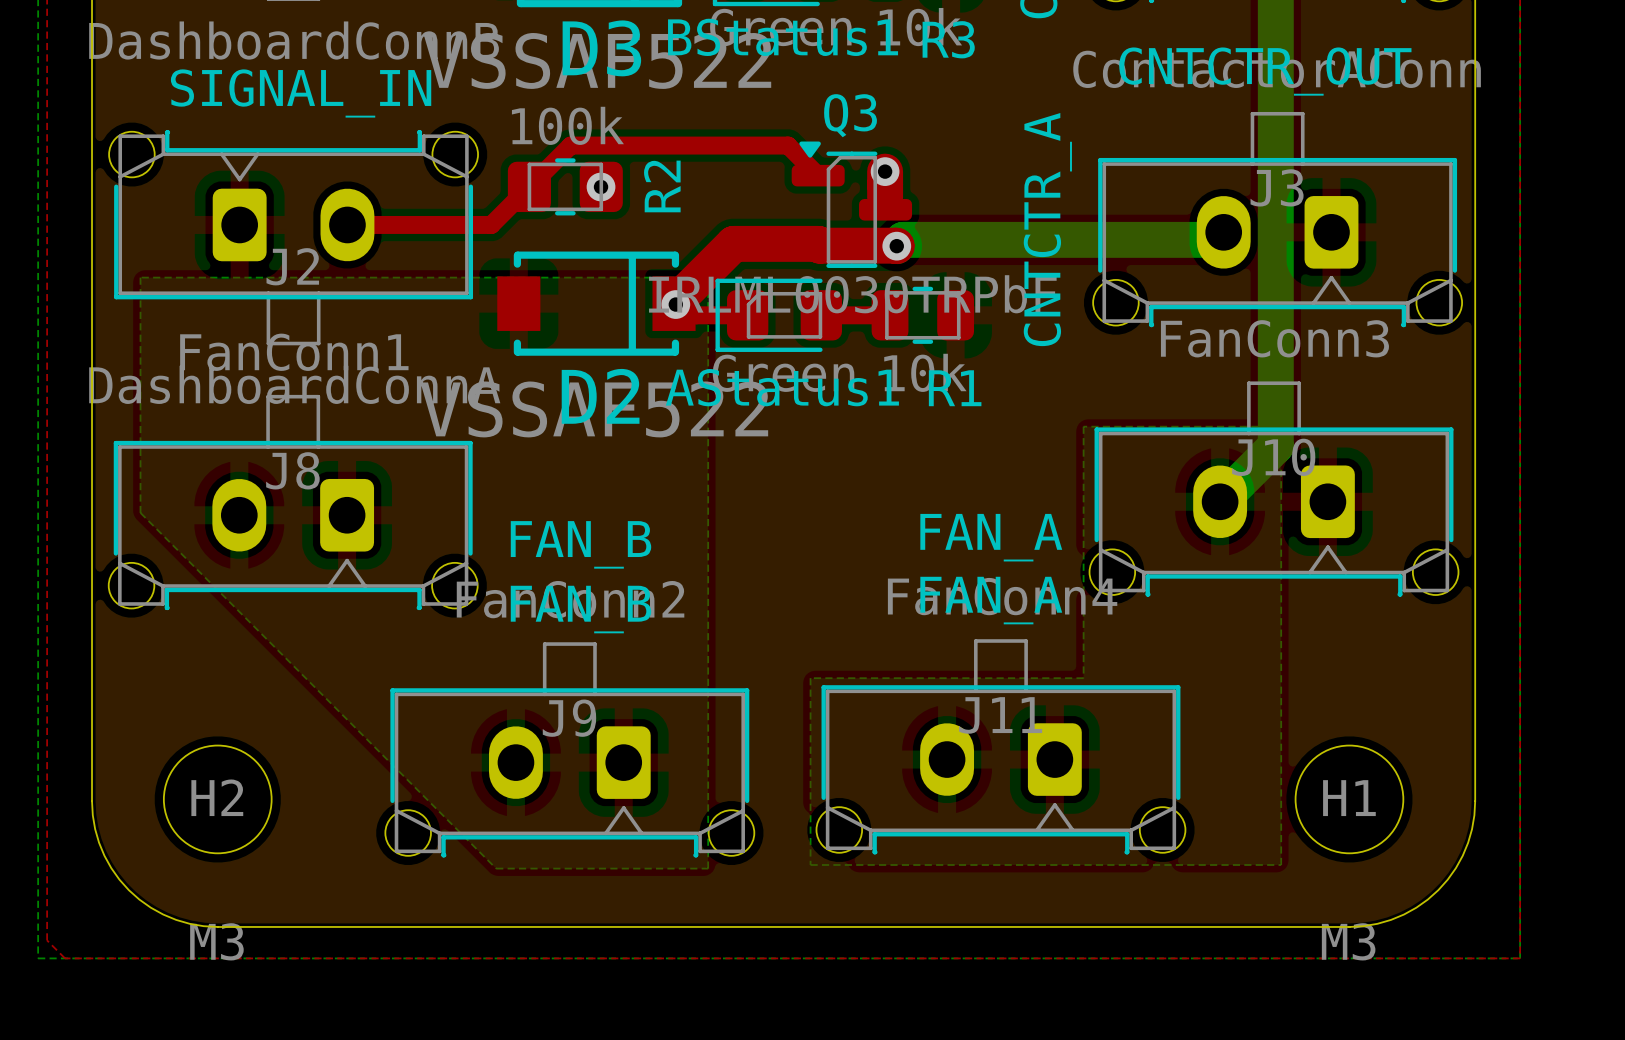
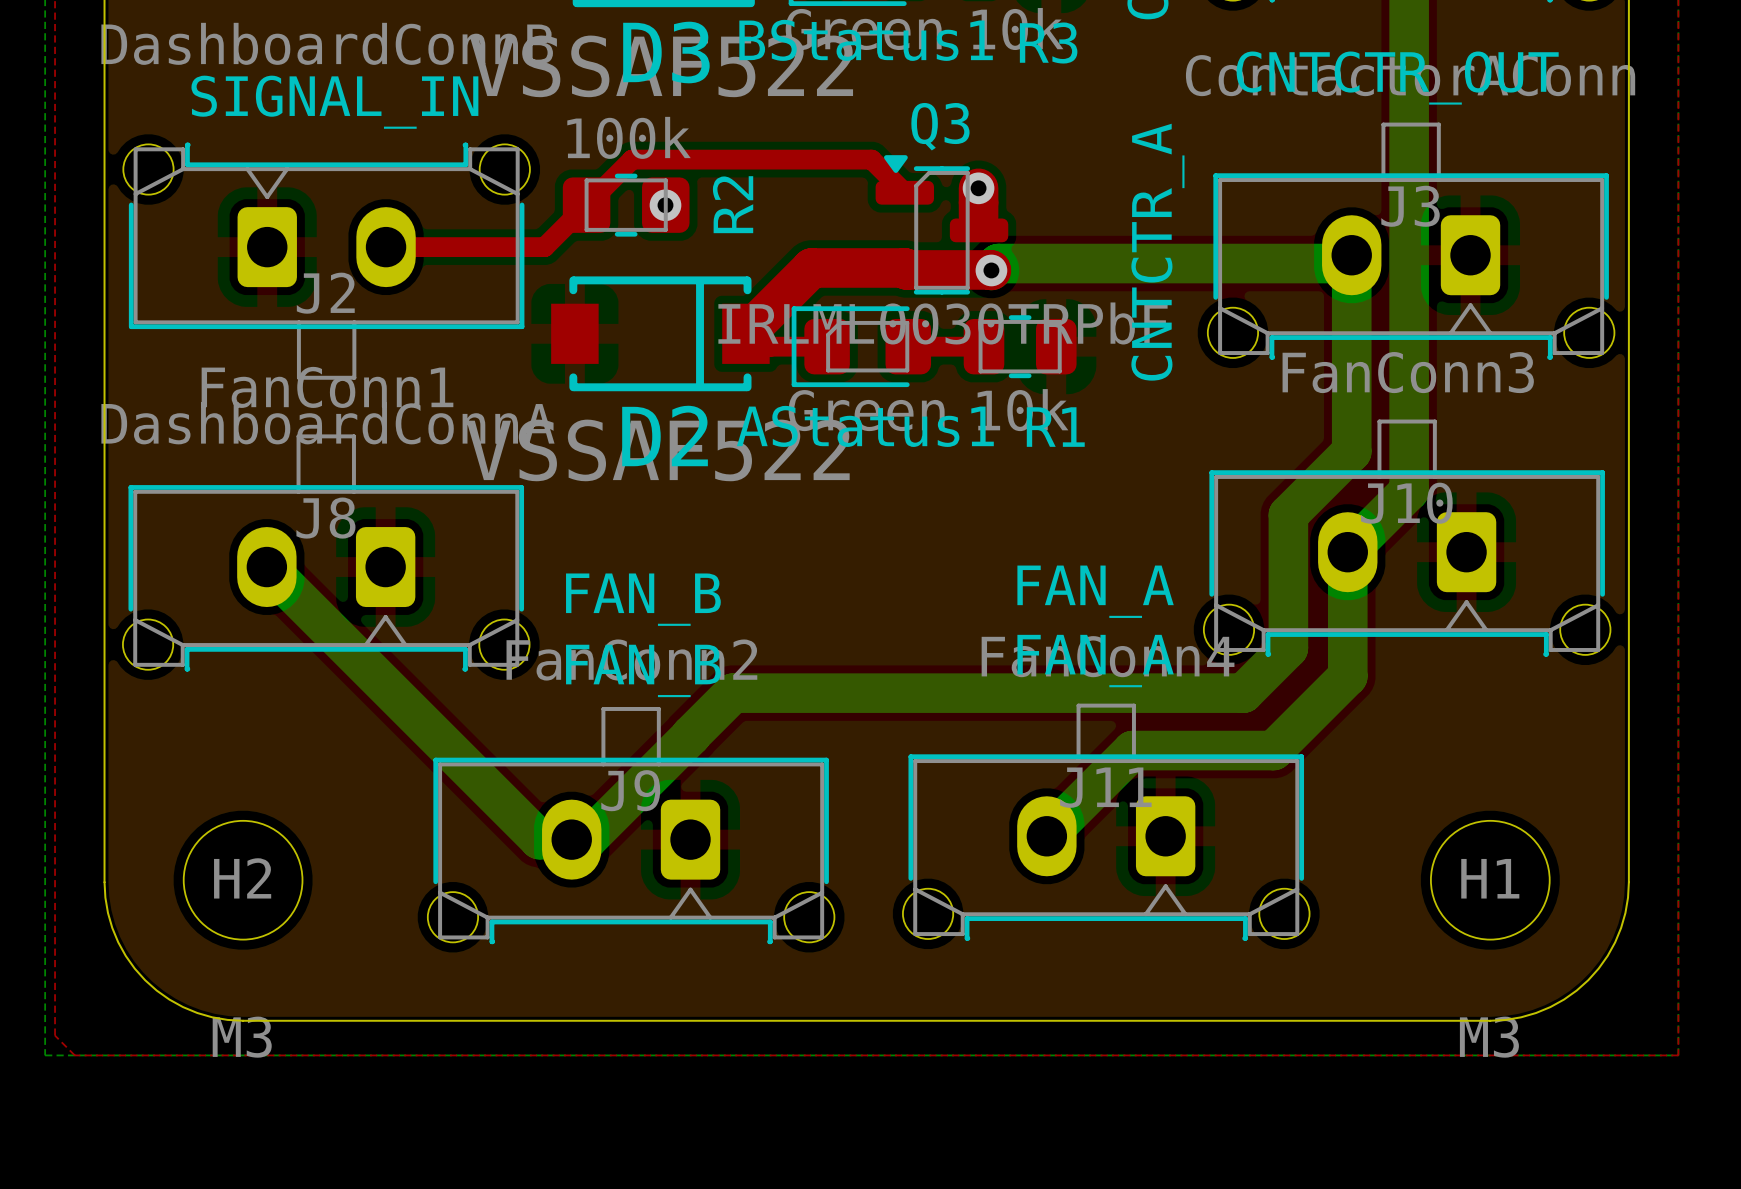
bottom track: none -> (1351, 255) (1351, 451) (1288, 514) (1288, 648) (1243, 693) (733, 693) (691, 735)
bottom zone outline: (140, 277) (708, 277) (708, 868) (496, 868) (140, 512) (140, 277) -> none
via: (675, 304) -> none
bottom zone outline: (1083, 426) (1281, 426) (1281, 865) (810, 865) (810, 678) (1083, 678) (1083, 426) -> none
bottom track: none -> (1347, 552) (1347, 676) (1273, 750) (1132, 750) (1046, 836)
bottom track: none -> (266, 567) (539, 839) (587, 839) (691, 735)

